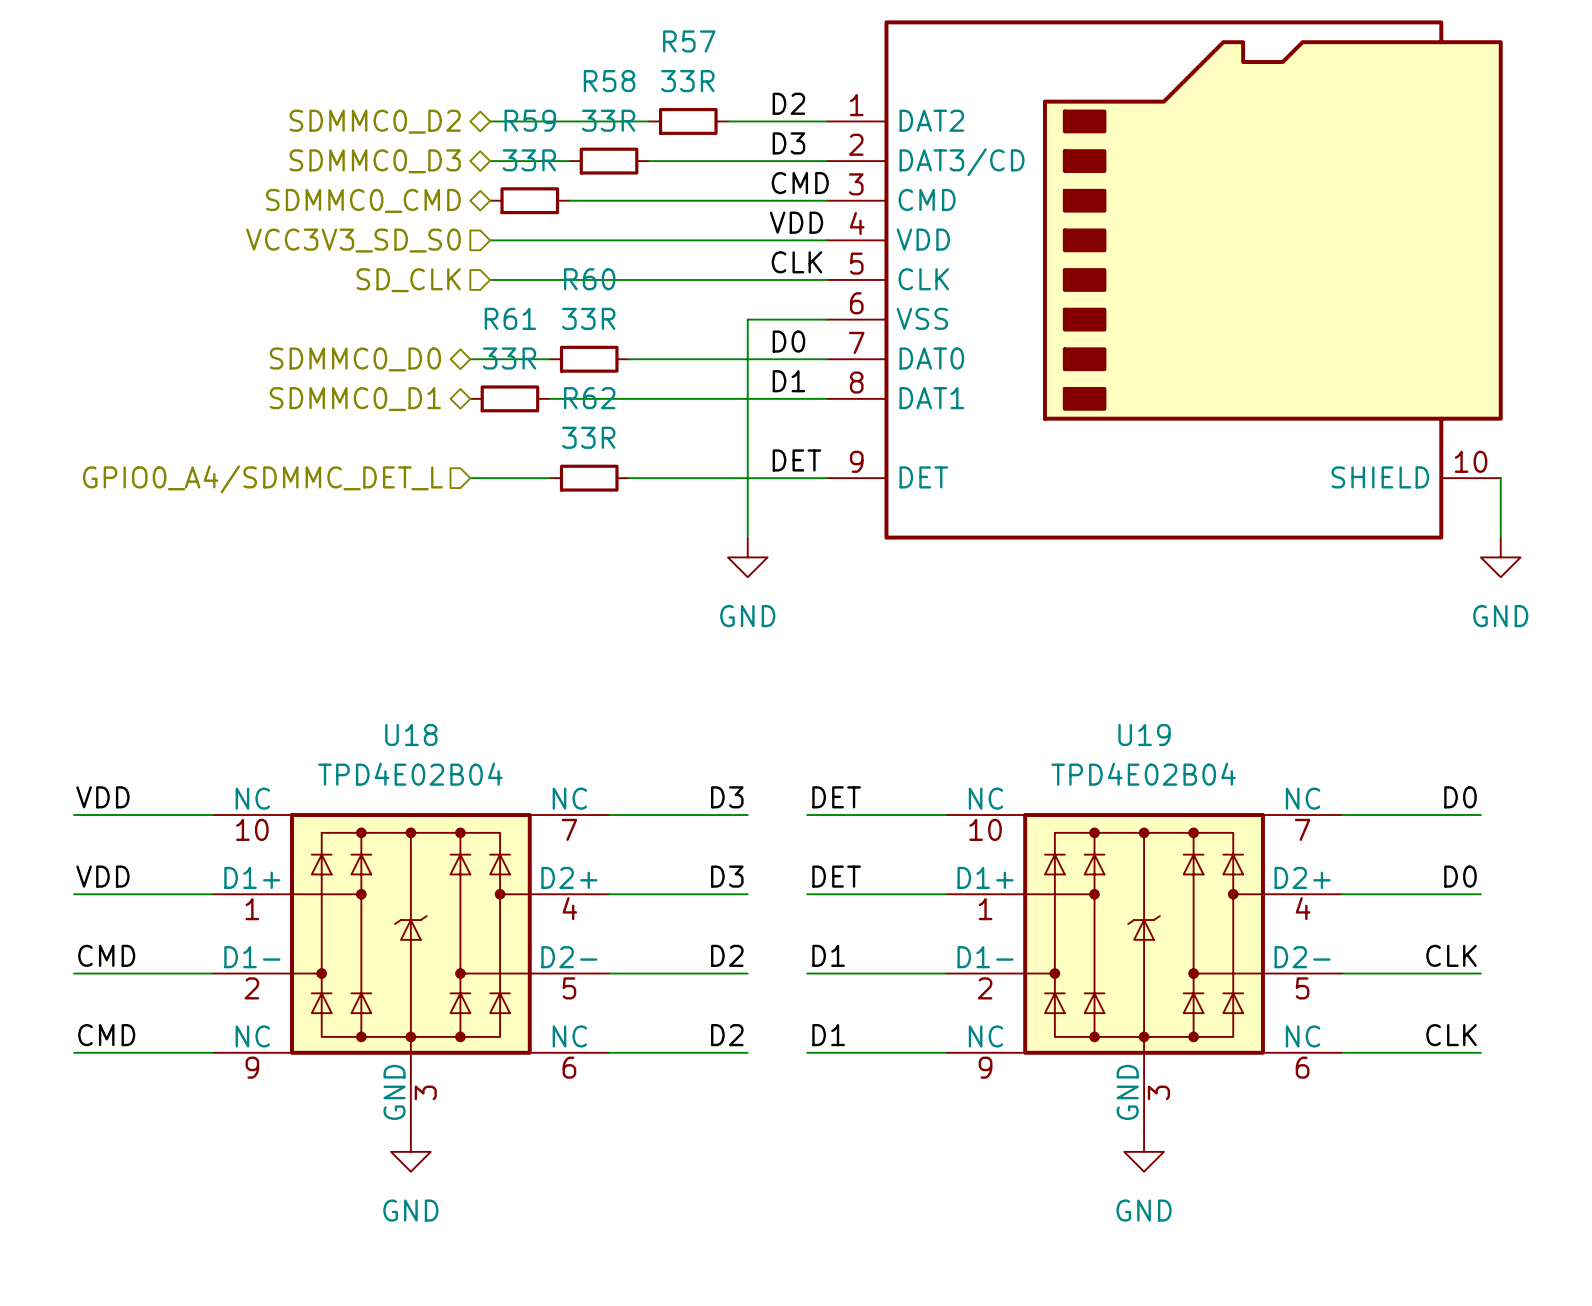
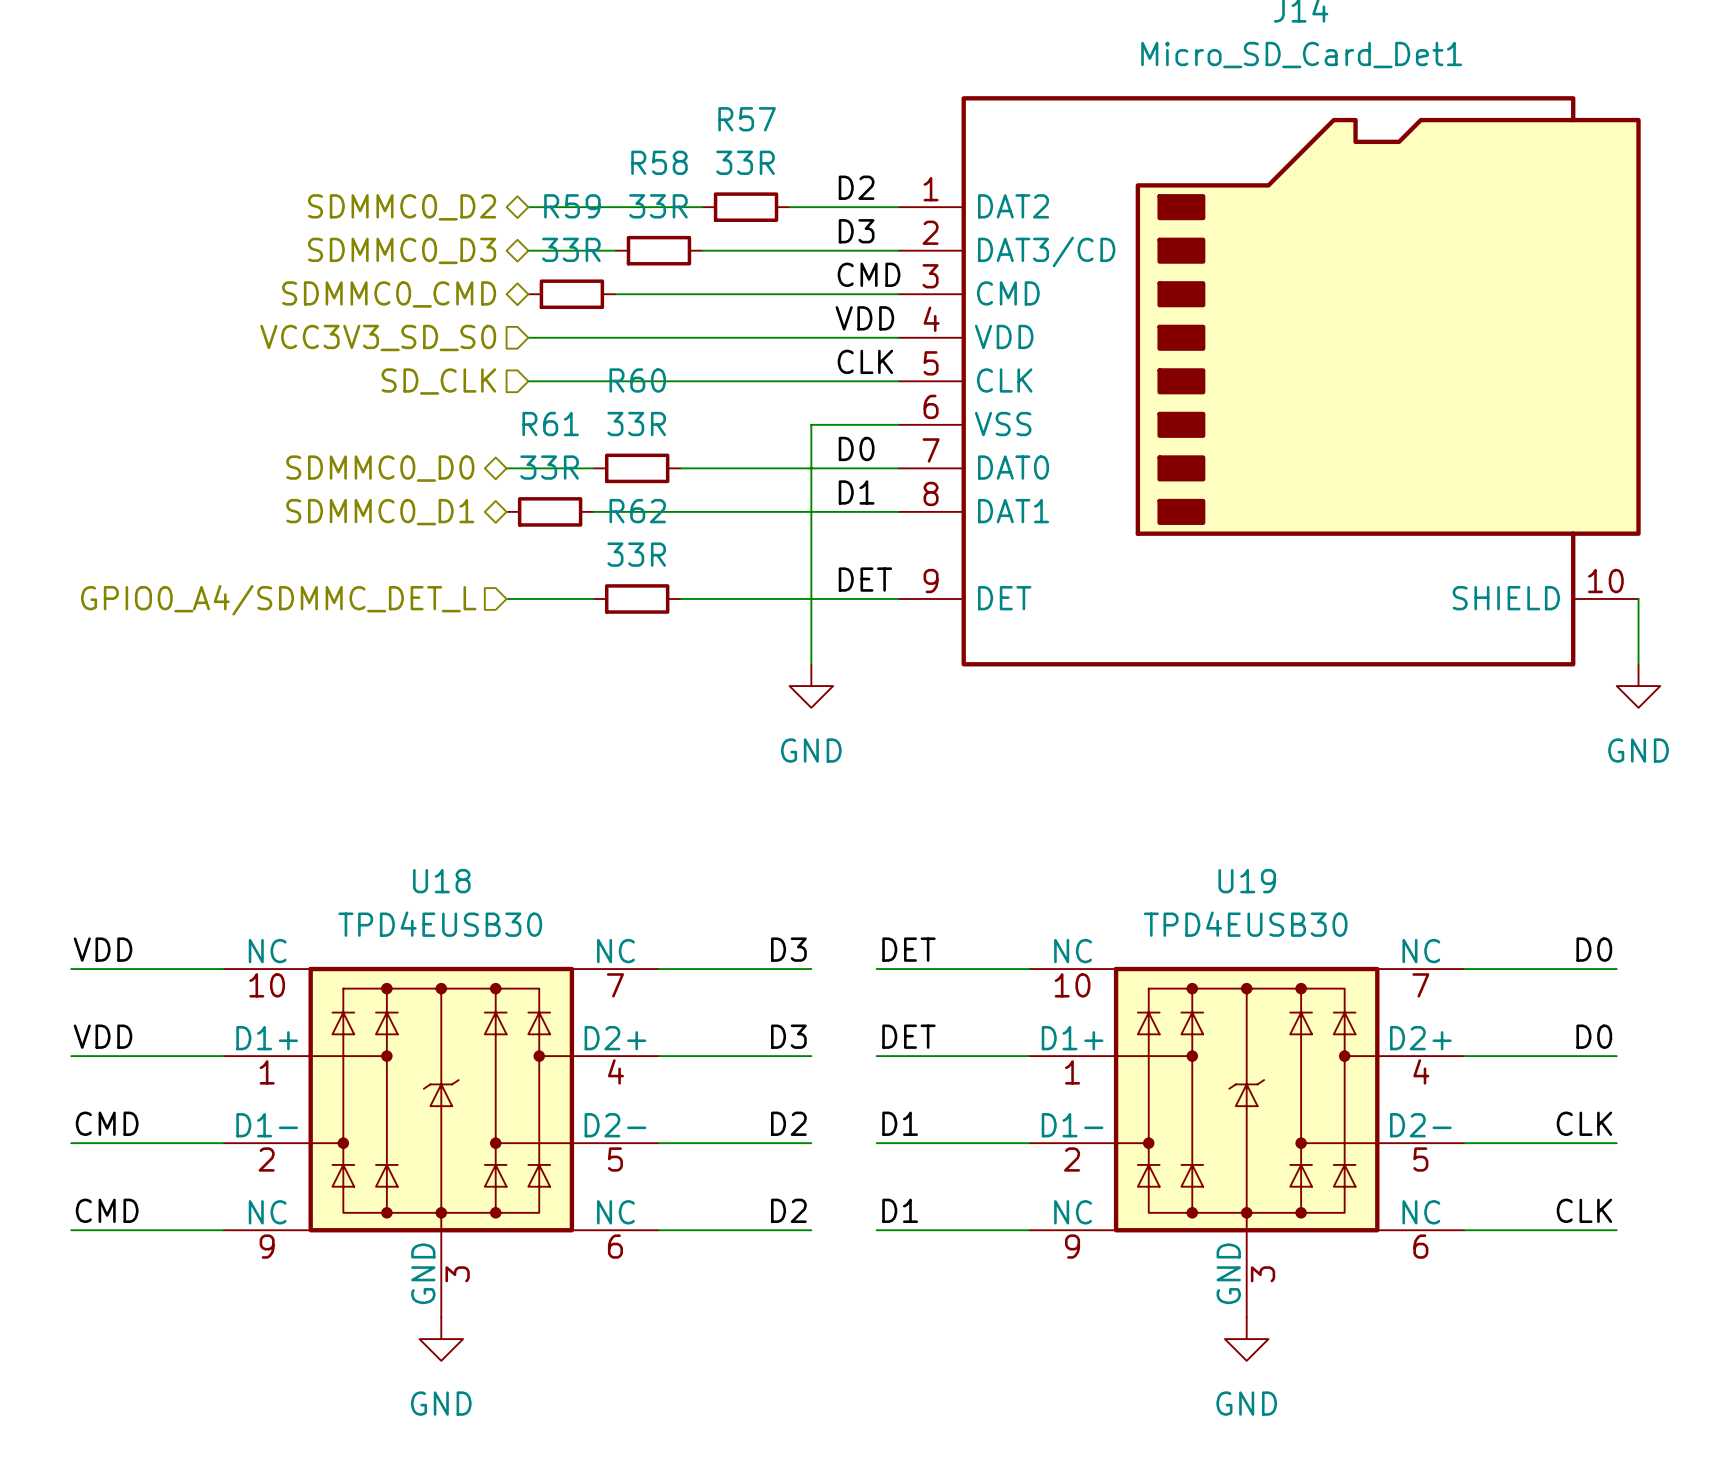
U18 value: TPD4E02B04 (410, 774) -> TPD4EUSB30 (440, 924)
U19 value: TPD4E02B04 (1143, 774) -> TPD4EUSB30 (1245, 924)

